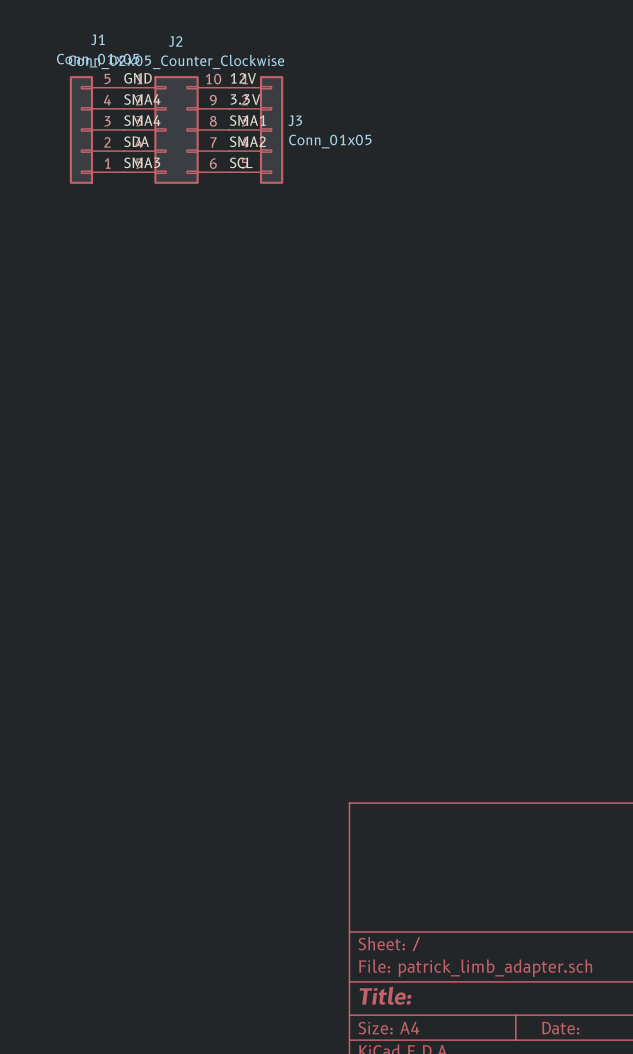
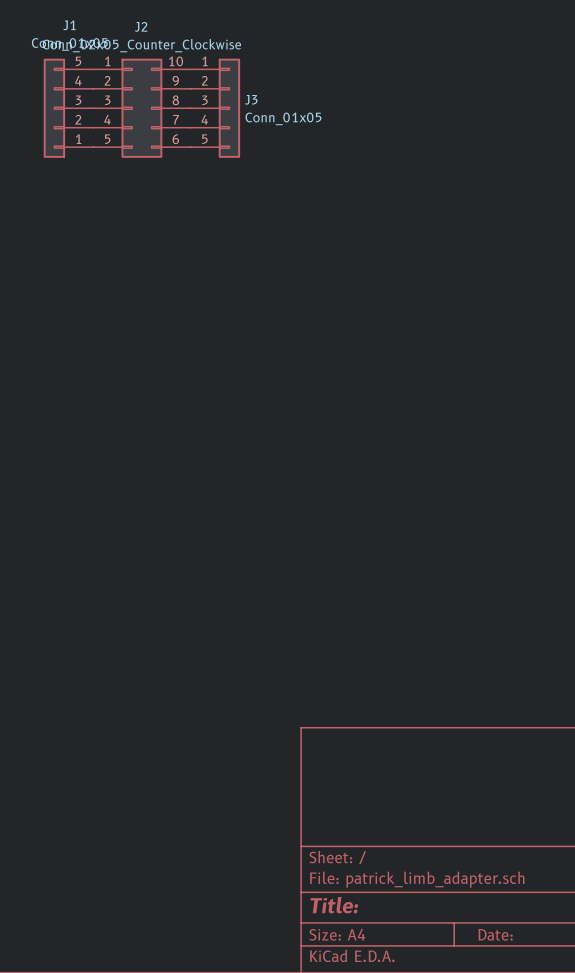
label: GND (138, 78) -> none
label: 12V (243, 78) -> none
label: SMA4 (142, 99) -> none
label: 3.3V (245, 99) -> none
label: SMA4 (142, 120) -> none
label: SMA1 (247, 120) -> none
label: SDA (136, 141) -> none
label: SMA2 (247, 141) -> none
label: SMA3 (142, 162) -> none
label: SCL (241, 162) -> none

